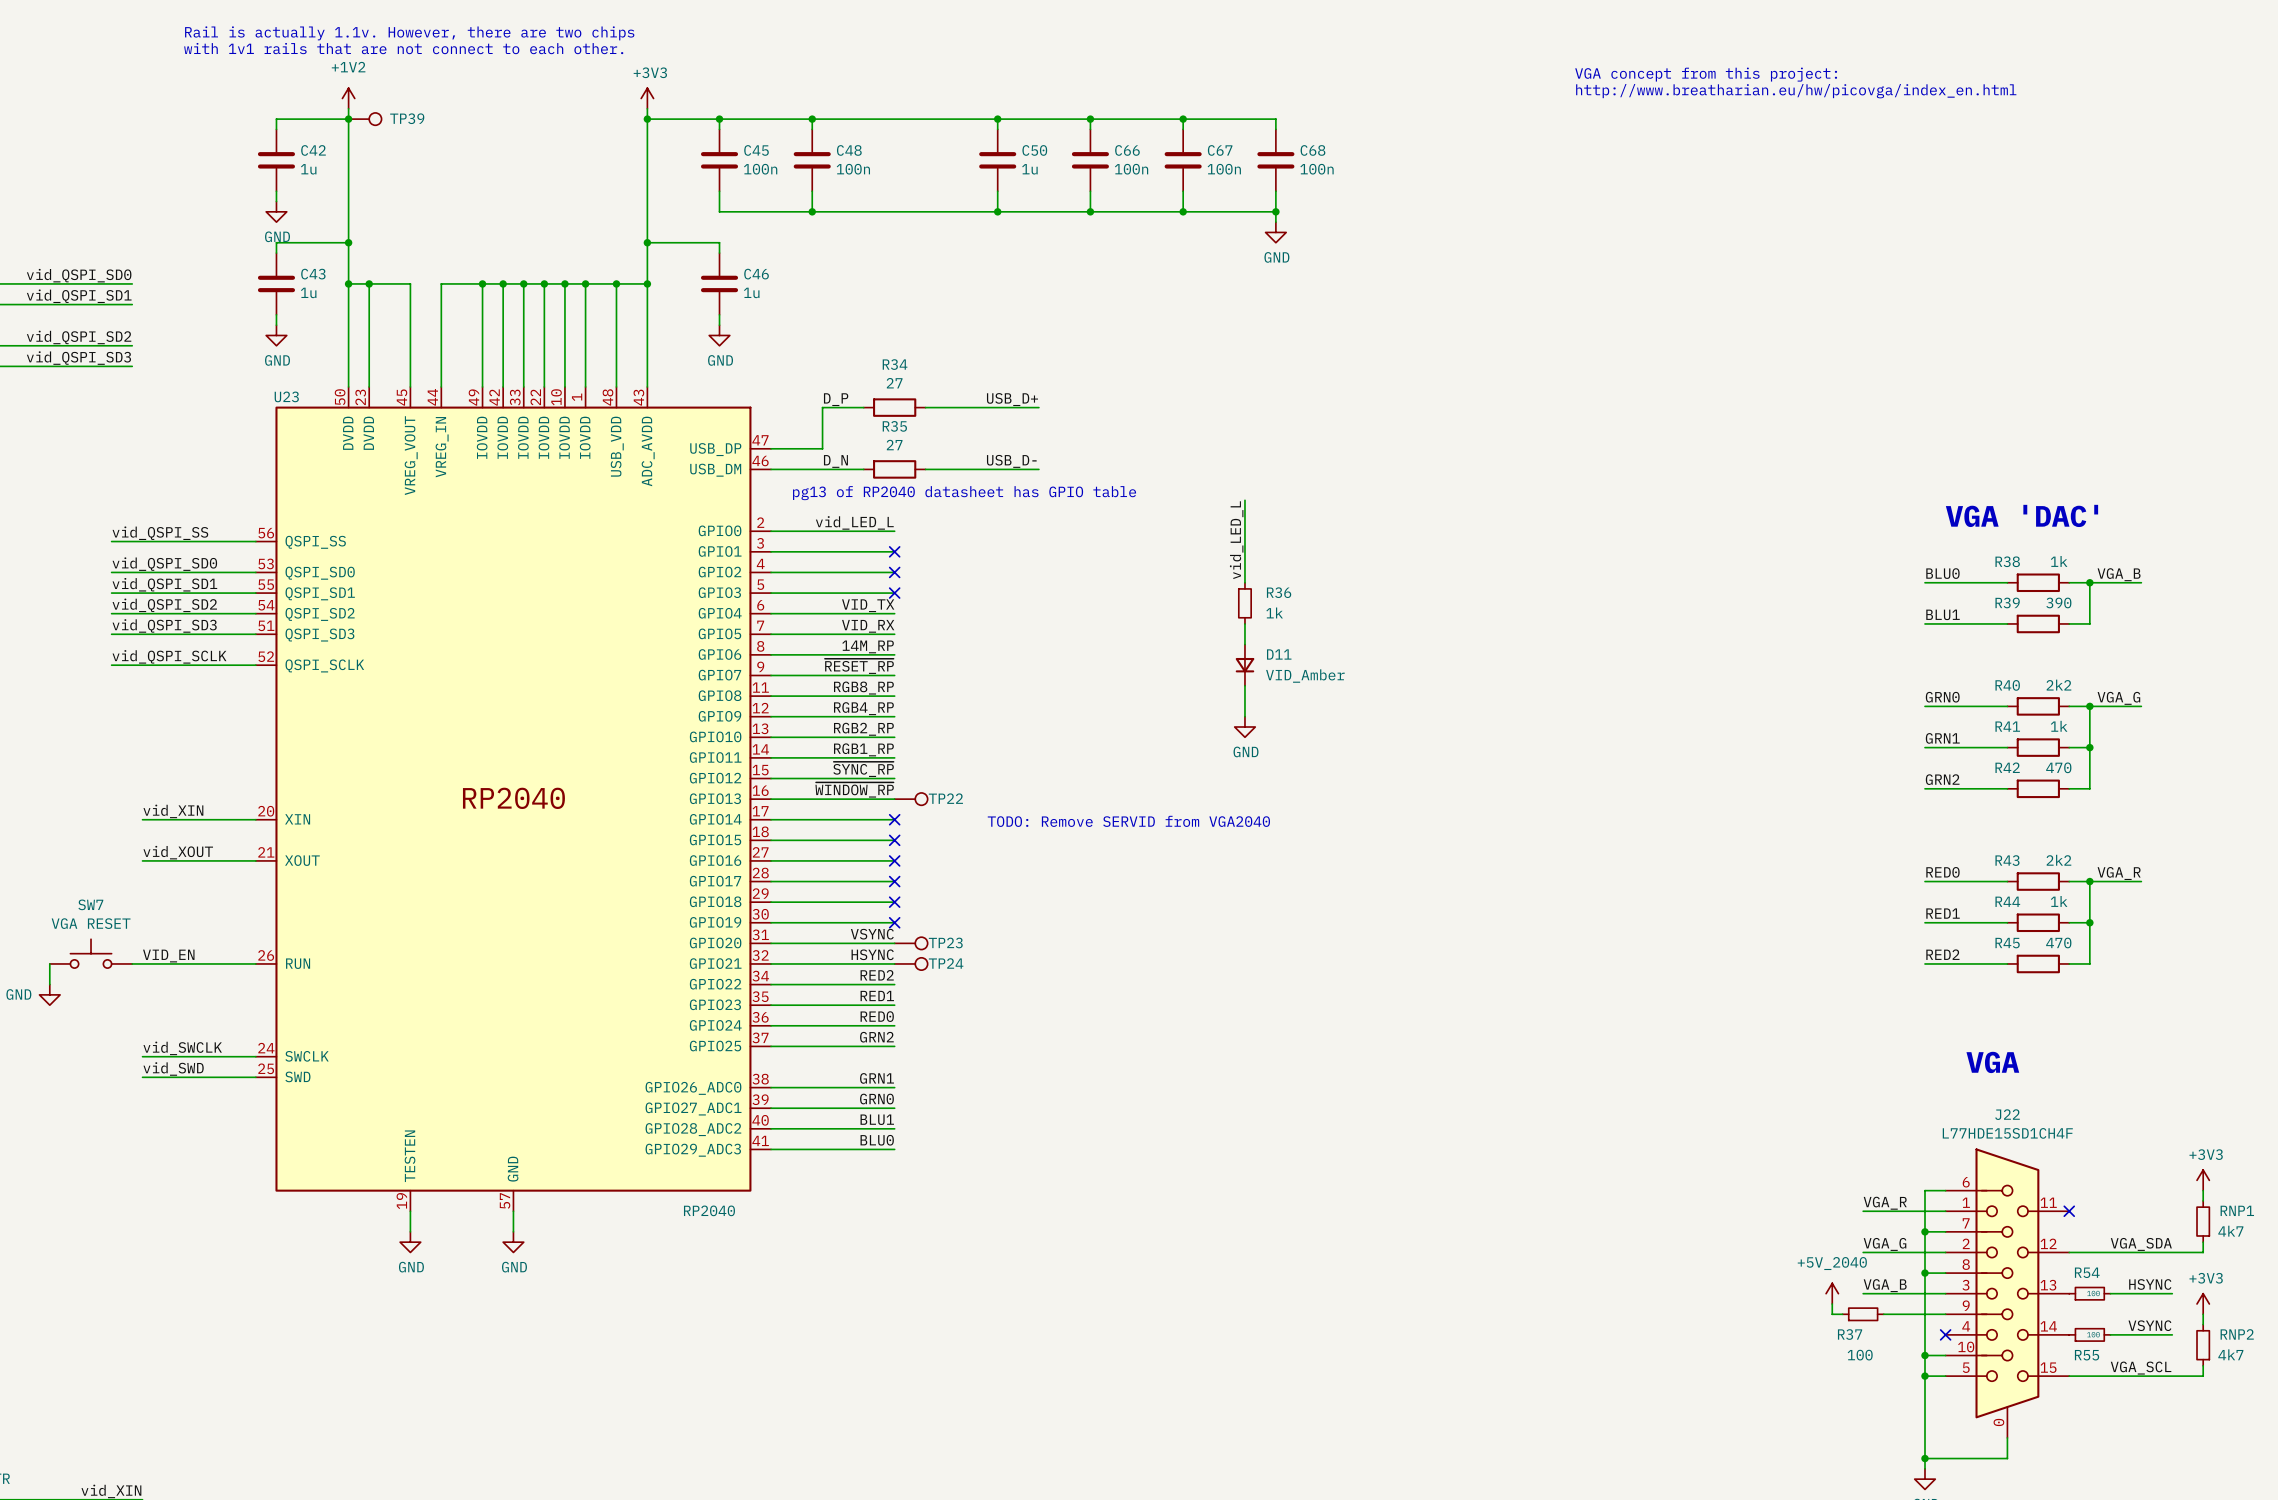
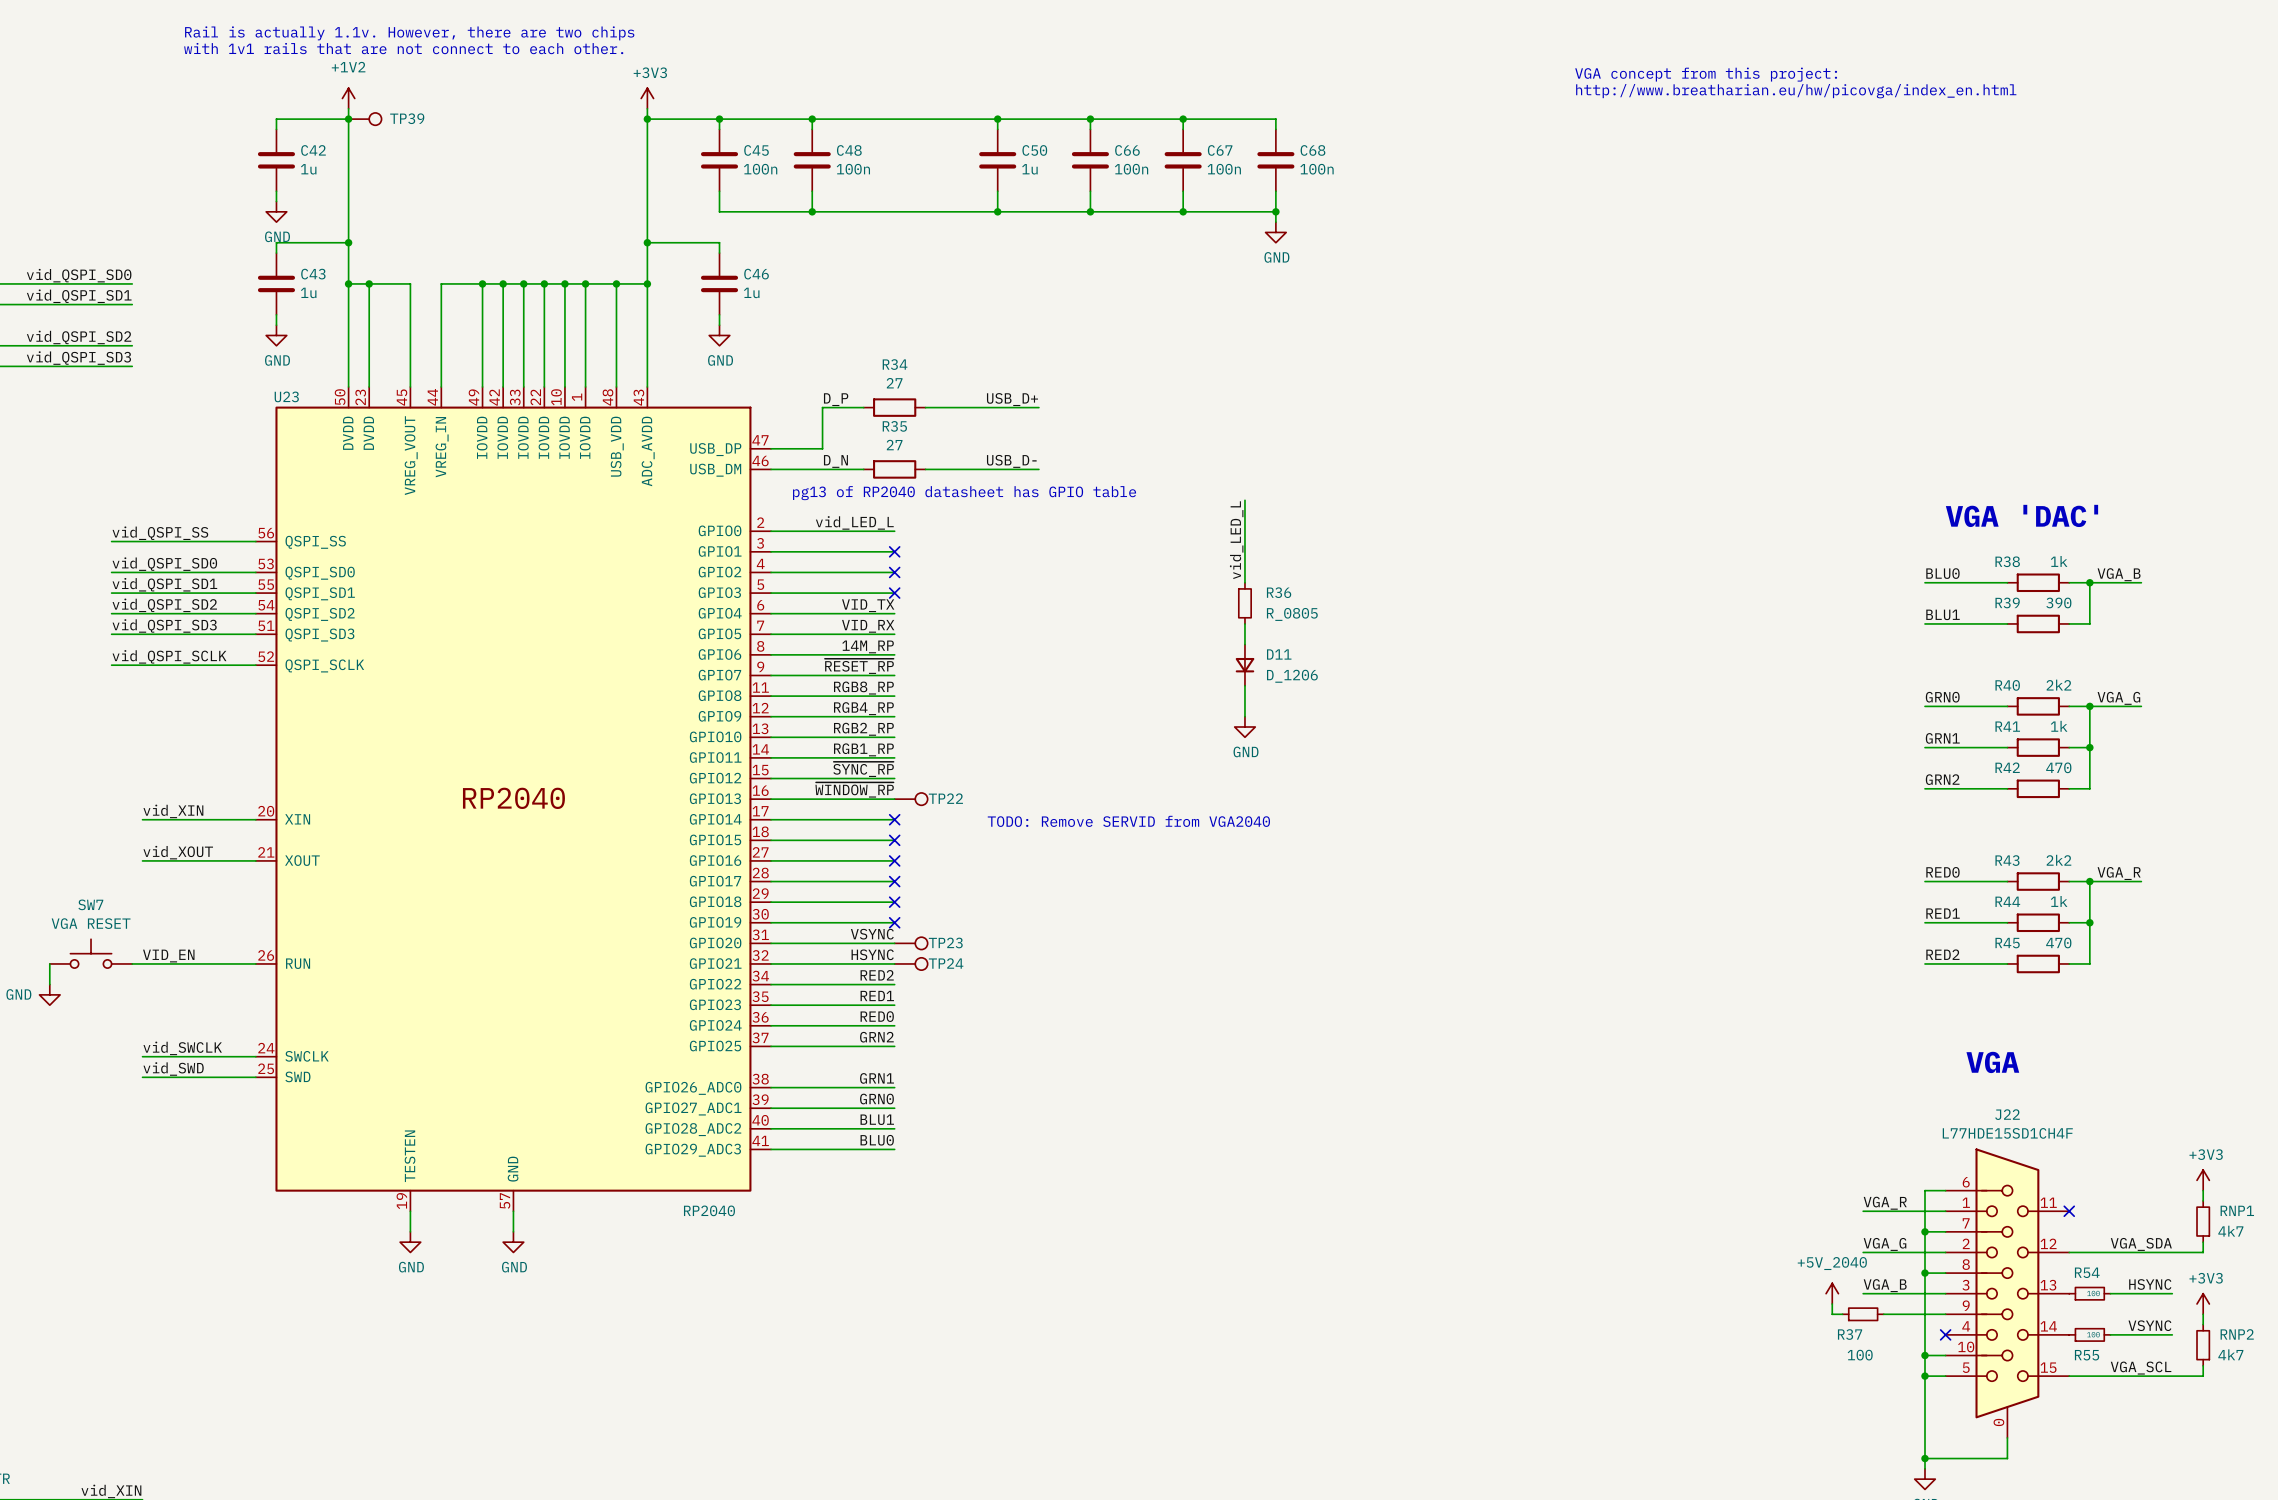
R36 value: 1k (1274, 612) -> R_0805 (1292, 614)
D11 value: VID_Amber (1305, 676) -> D_1206 (1292, 676)

